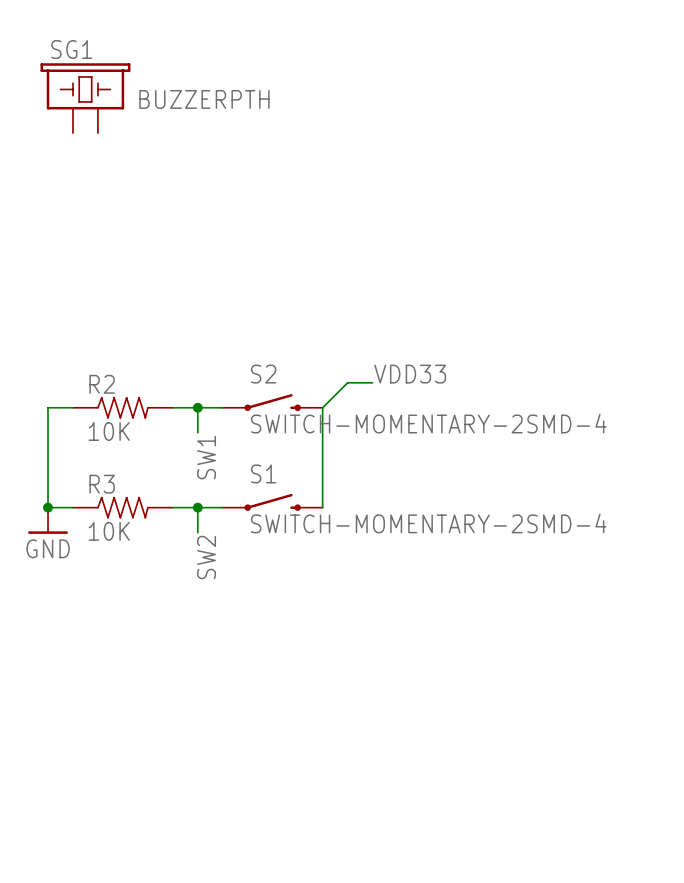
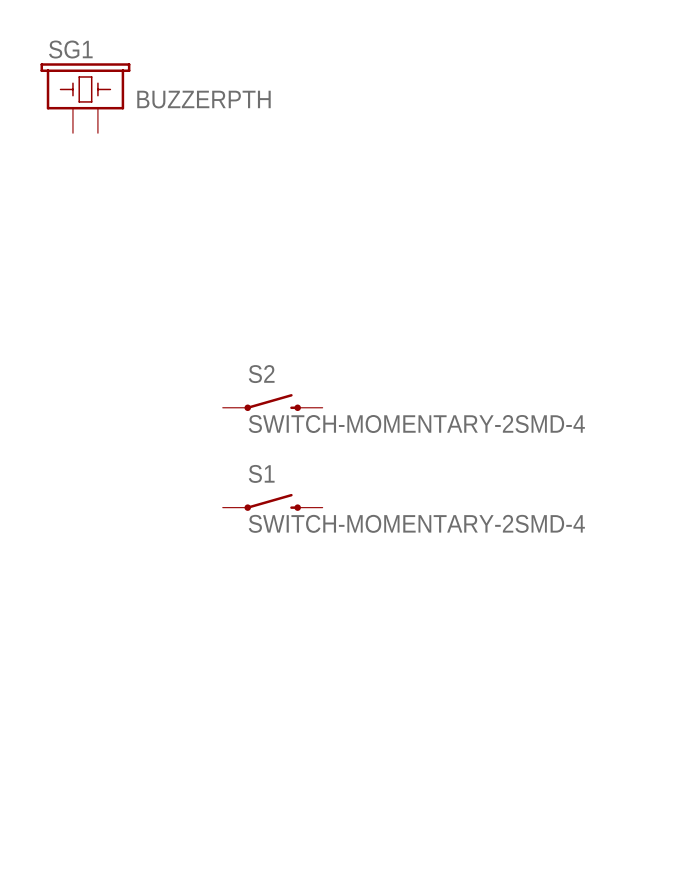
label: VDD33 (410, 374) -> none
wire: (372, 382) (347, 382) (322, 407) (322, 507) -> none
wire: (72, 407) (48, 407) (48, 507) (72, 507) -> none
R2: 10K (122, 407) -> none
wire: (172, 407) (222, 407) -> none
wire: (197, 407) (197, 432) -> none
junction: (197, 407) -> none
label: SW1 (206, 457) -> none
junction: (48, 507) -> none
R3: 10K (122, 507) -> none
wire: (172, 507) (222, 507) -> none
wire: (197, 507) (197, 532) -> none
junction: (197, 507) -> none
power symbol: GND (48, 520) -> none
label: SW2 (206, 557) -> none

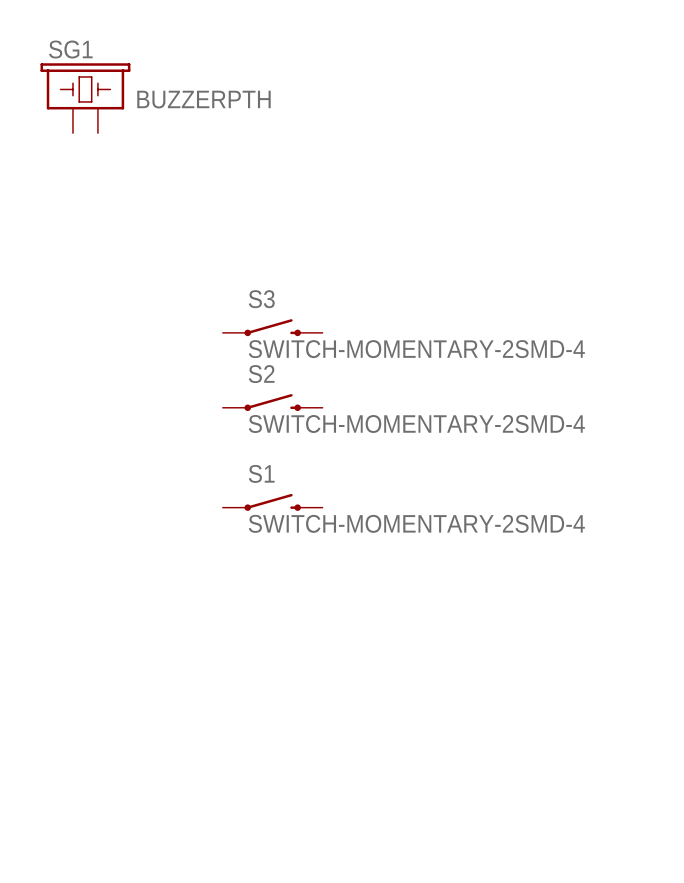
S3: none -> SWITCH-MOMENTARY-2SMD-4 (272, 327)

